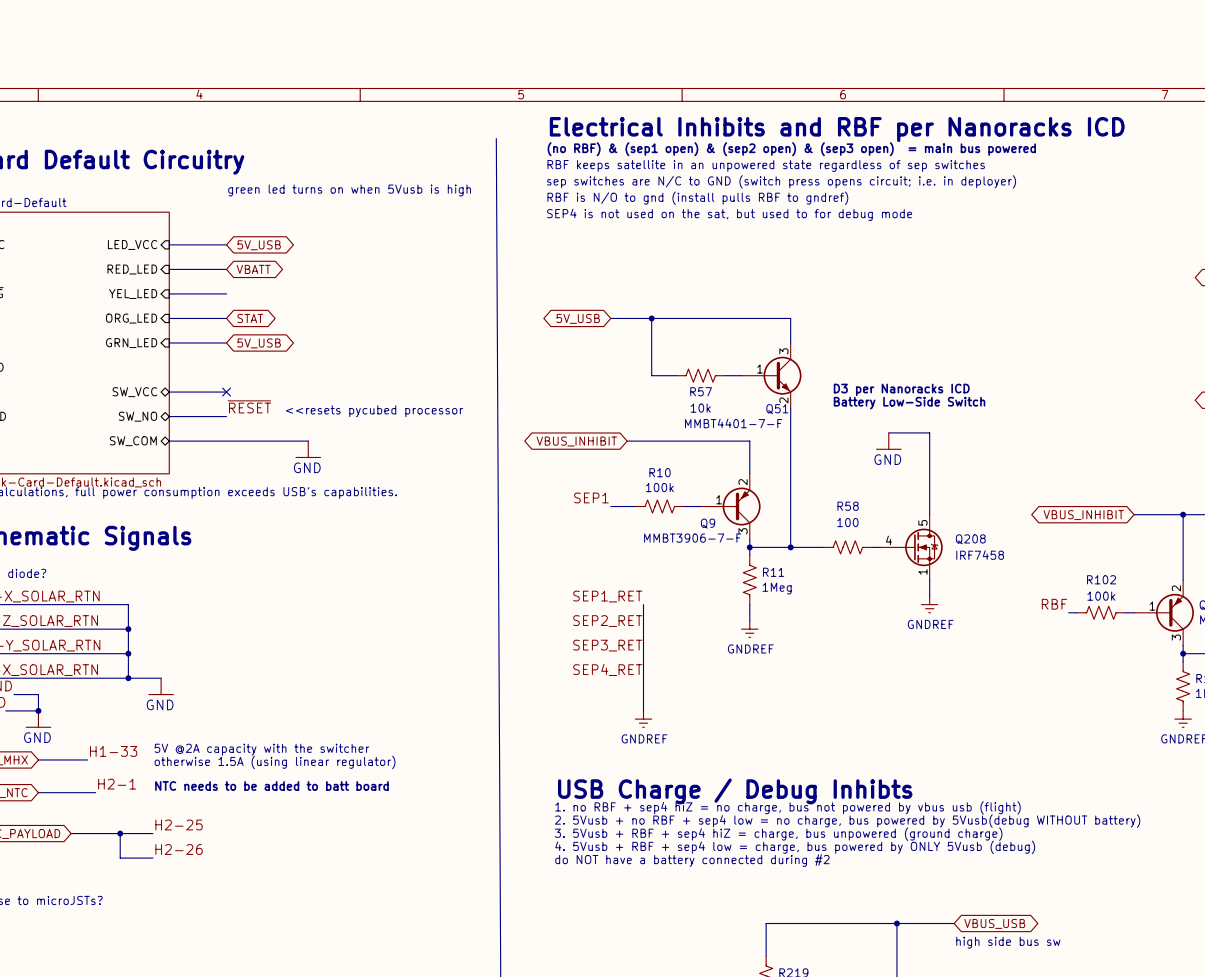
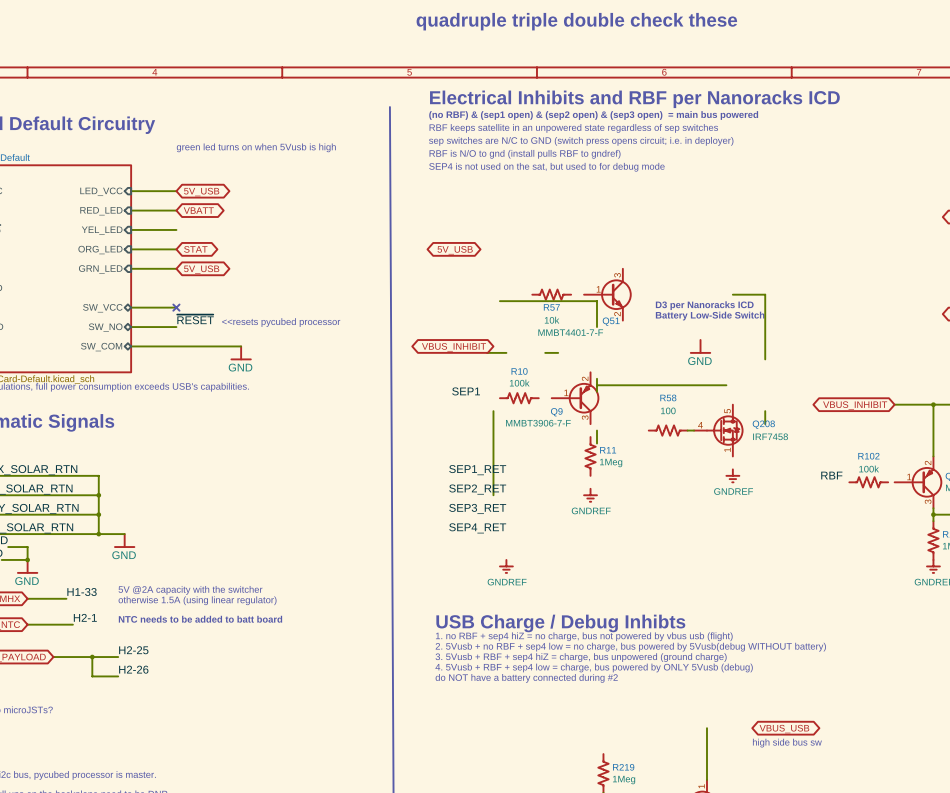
text: none -> quadruple triple double check these (576, 21)
wire: (610, 318) (790, 318) (790, 342) -> none
wire: (651, 318) (651, 375) (676, 375) -> none
junction: (651, 318) -> none
wire: (725, 375) (741, 375) -> none
wire: (790, 408) (790, 547) -> none
wire: (888, 432) (929, 432) (929, 514) -> (732, 294) (765, 294) (765, 359)
wire: (627, 441) (749, 441) (749, 473) -> (499, 301) (597, 301) (597, 327)
wire: none -> (597, 385) (726, 385)
wire: (610, 506) (635, 506) -> (487, 352) (506, 352)
wire: (684, 506) (700, 506) -> (545, 352) (558, 352)
wire: (749, 539) (749, 555) -> (597, 378) (597, 391)
wire: (749, 547) (823, 547) -> none
junction: (749, 547) -> none
junction: (790, 547) -> none
wire: (929, 580) (929, 596) -> (765, 411) (765, 424)
wire: (643, 604) (643, 710) -> (493, 411) (493, 495)
wire: (749, 604) (749, 620) -> (597, 430) (597, 443)
wire: (1068, 612) (1076, 612) -> none
wire: (1125, 612) (1134, 612) -> none
junction: (896, 923) -> none
wire: (954, 923) (766, 923) (766, 956) -> none

